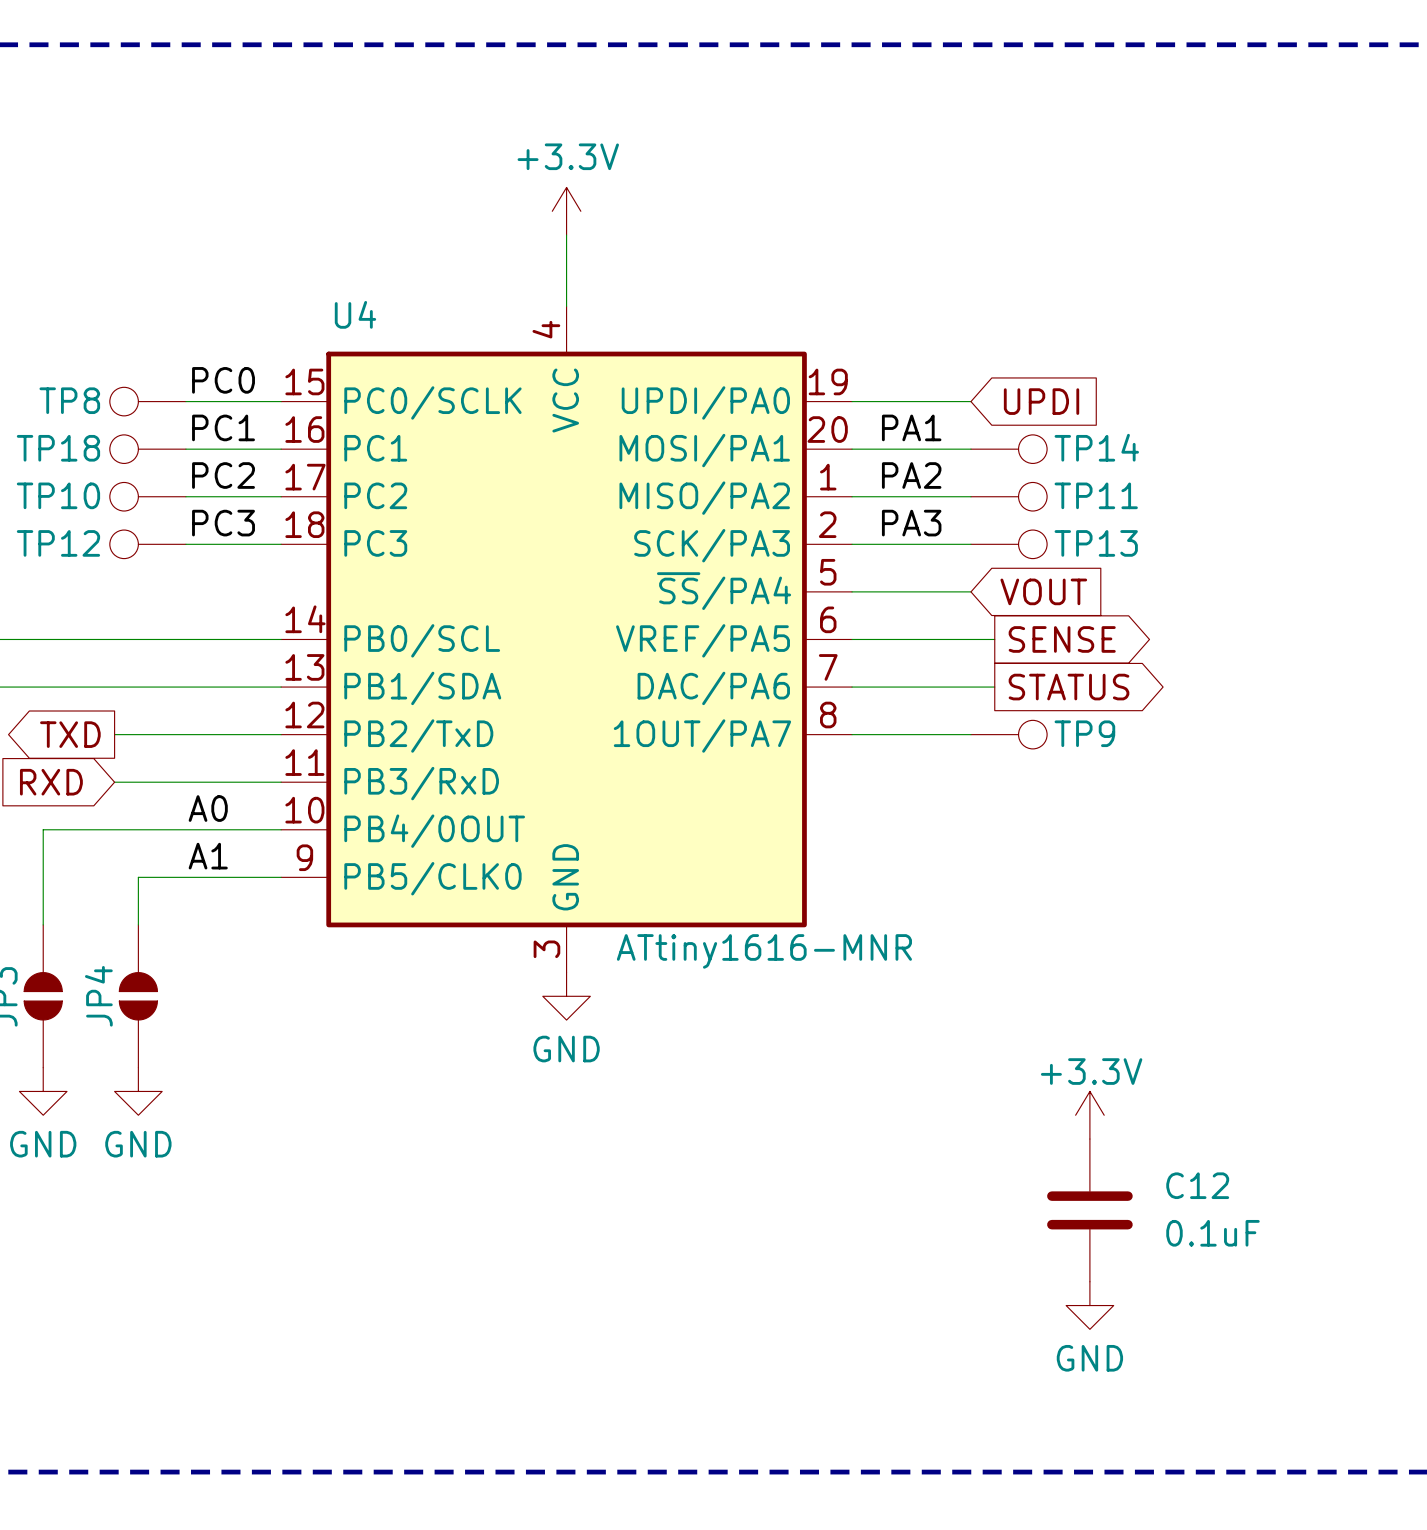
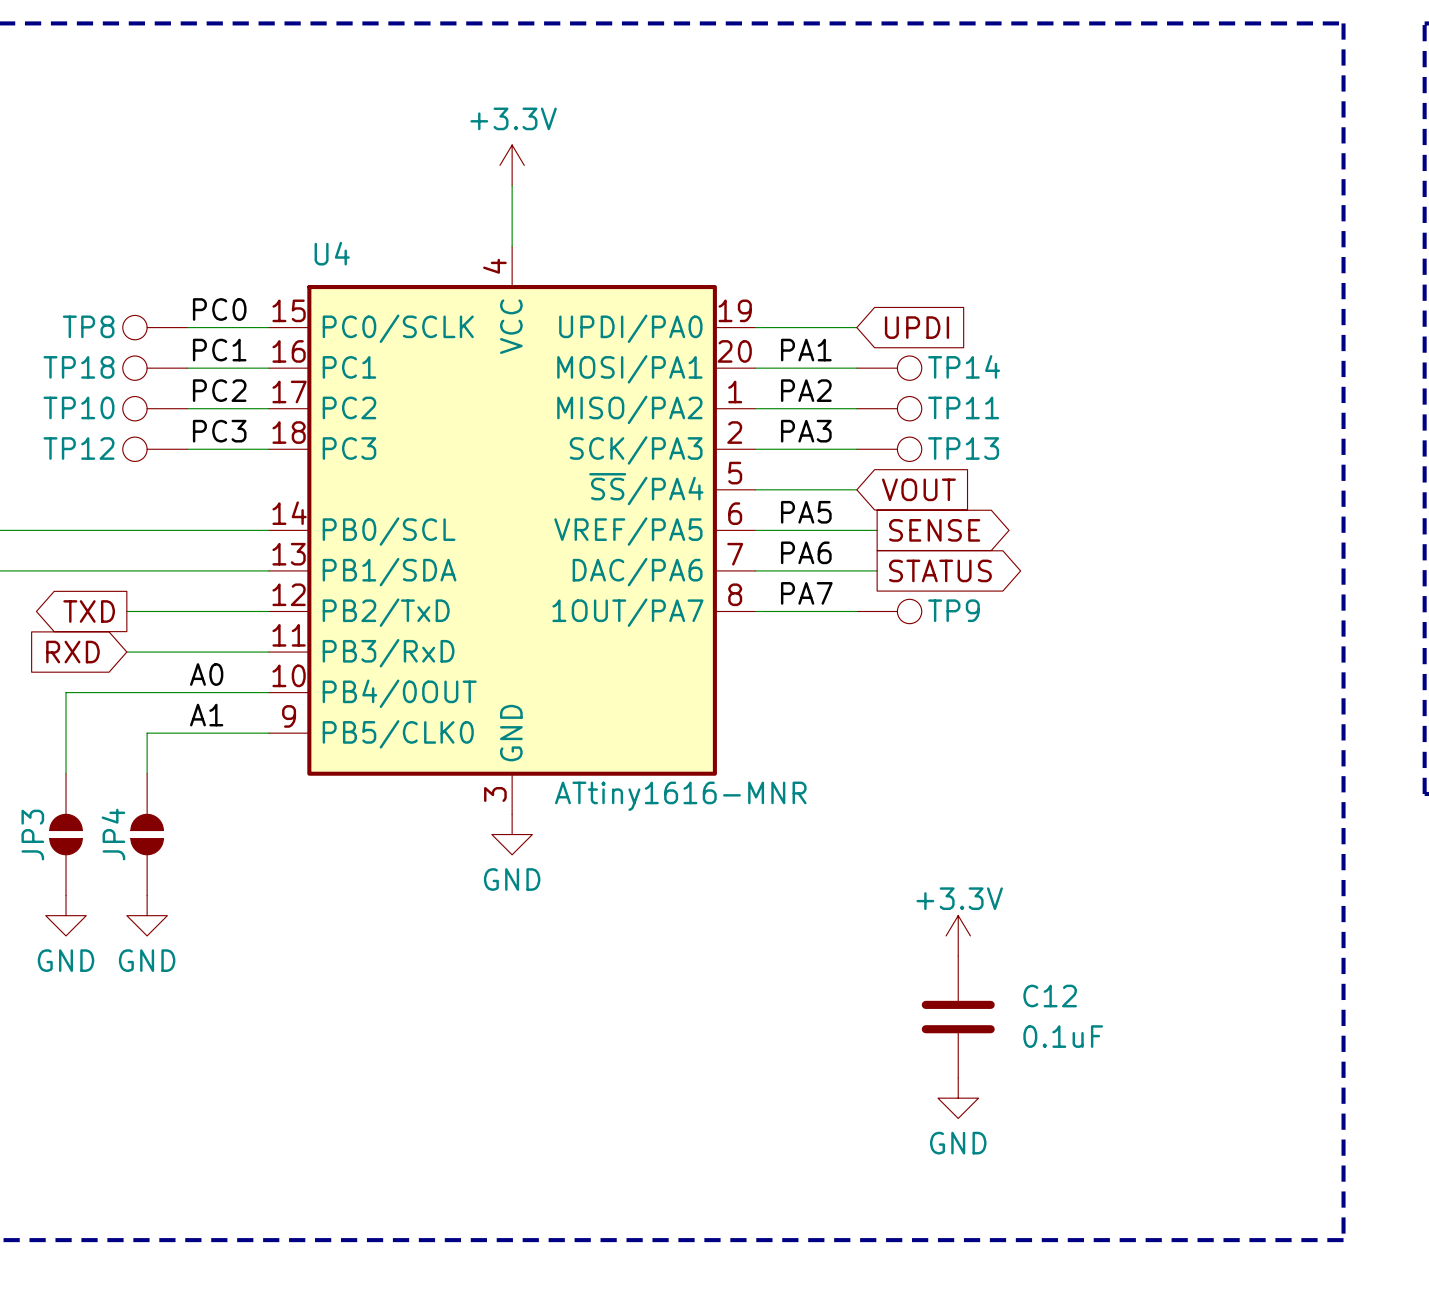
label: none -> PA5 (806, 512)
label: none -> PA6 (806, 552)
label: none -> PA7 (806, 593)

